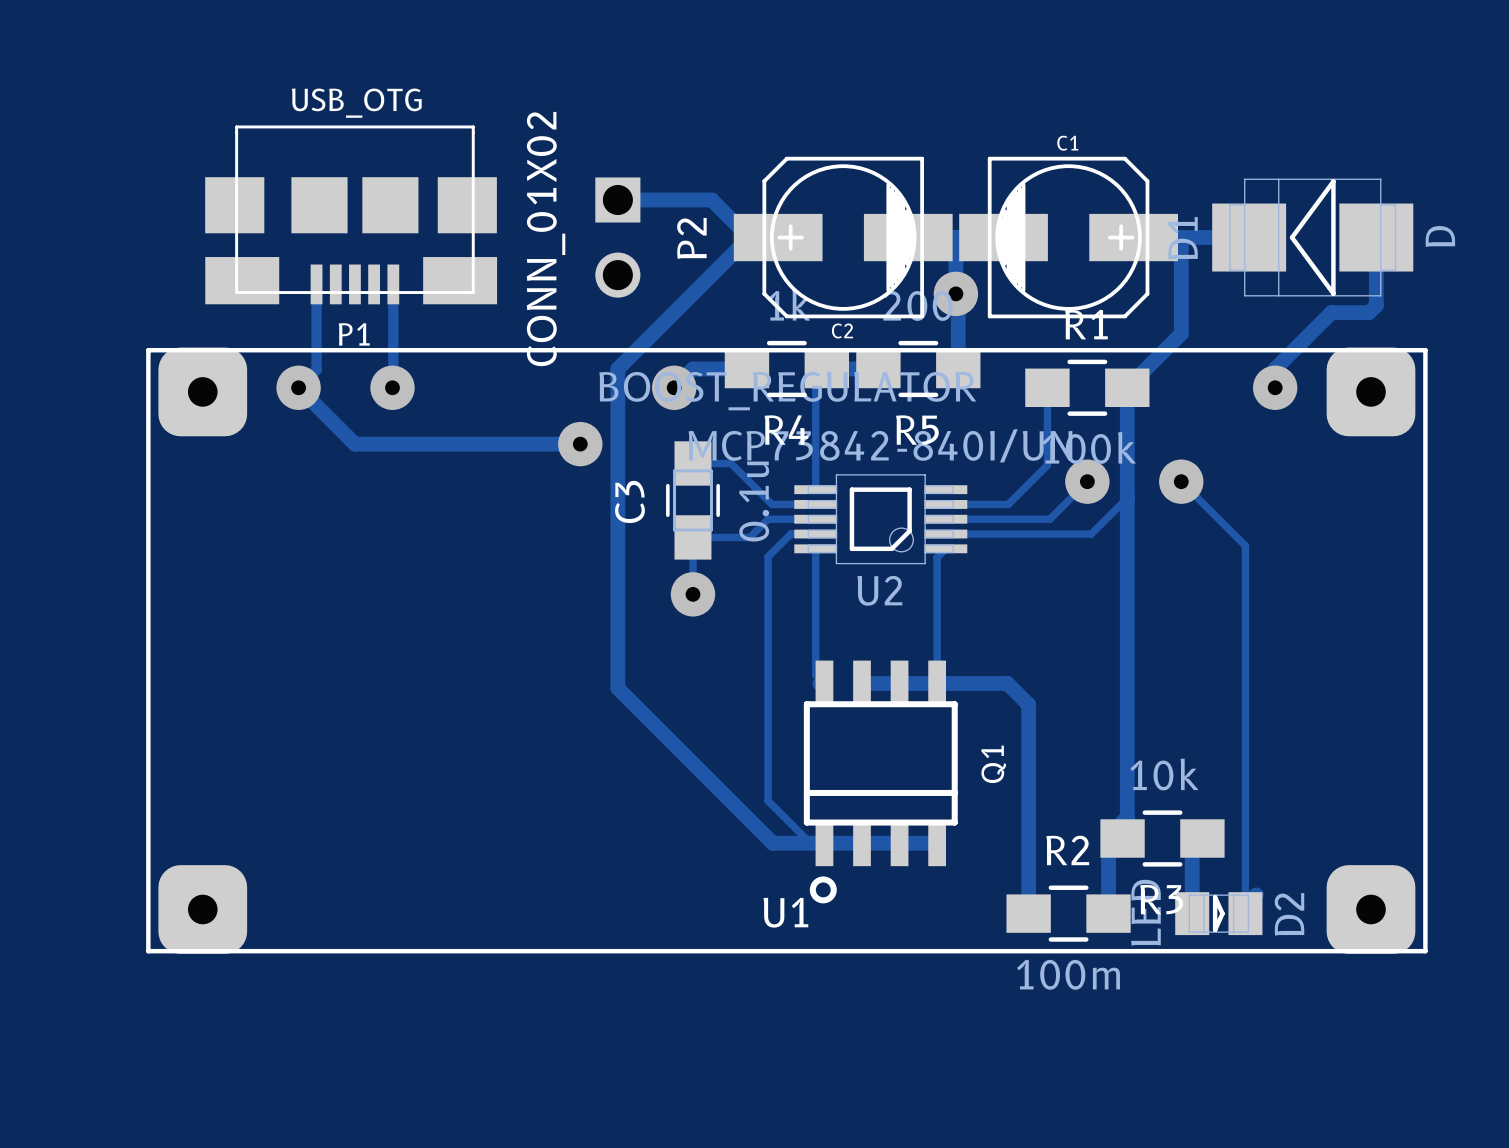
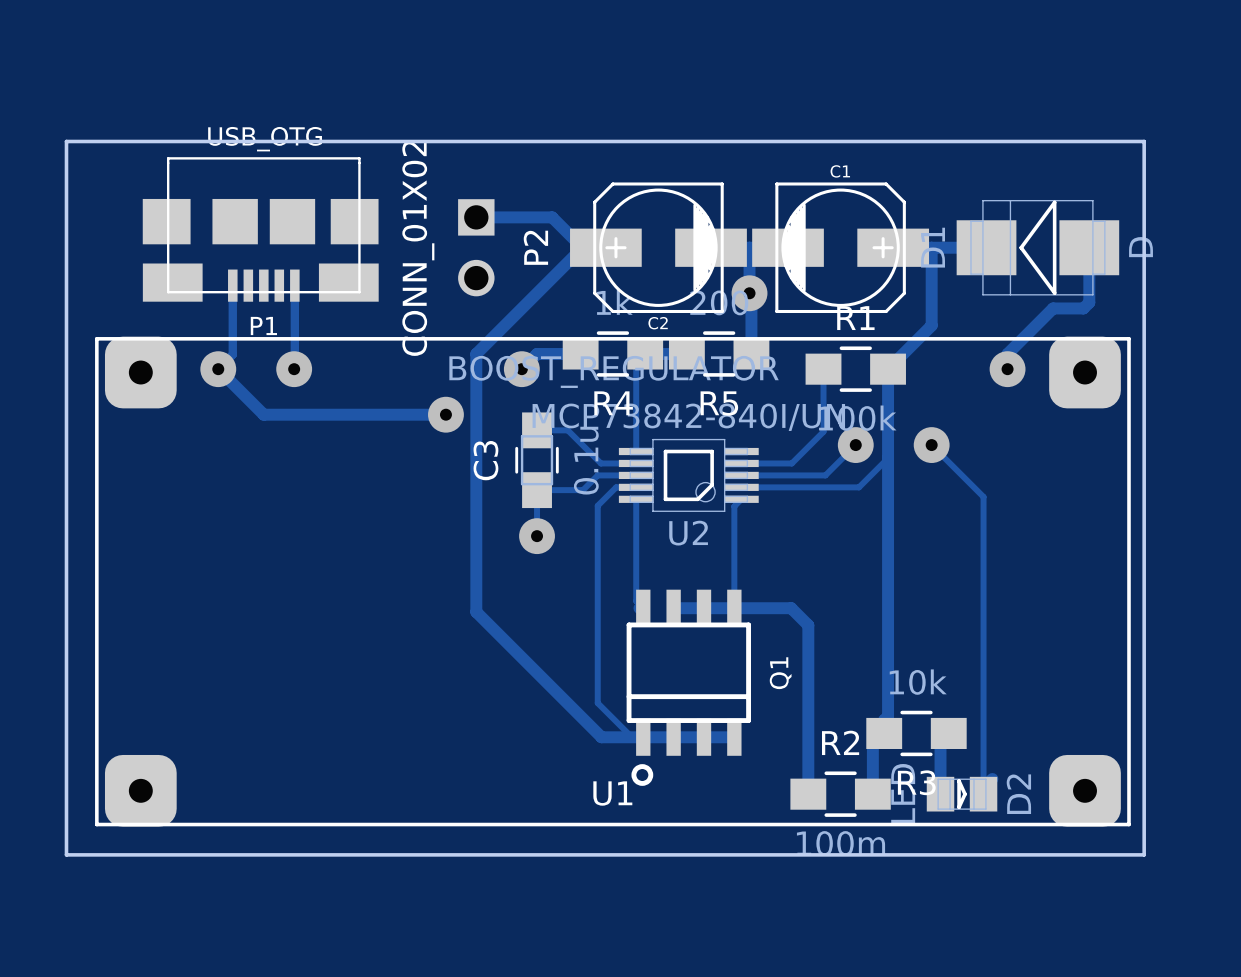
board edge: none -> (66, 141) (66, 854) (1144, 854) (1144, 141) (66, 141)

